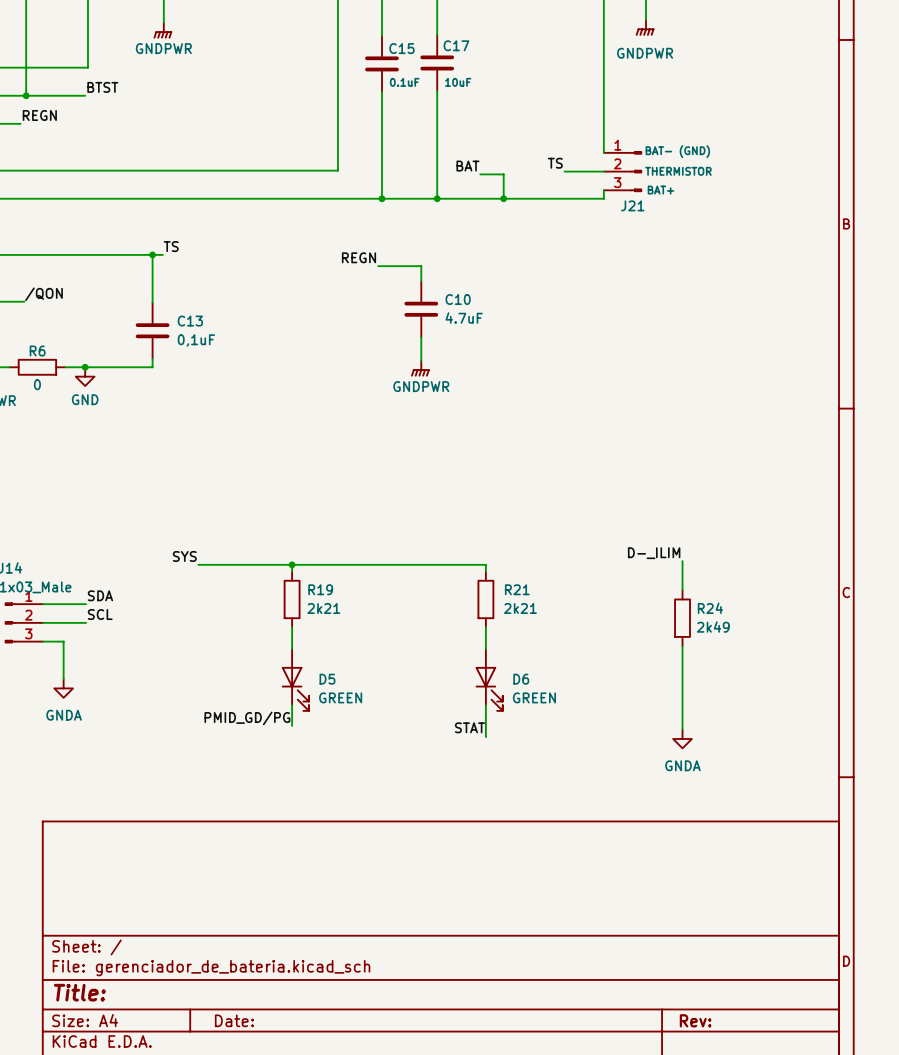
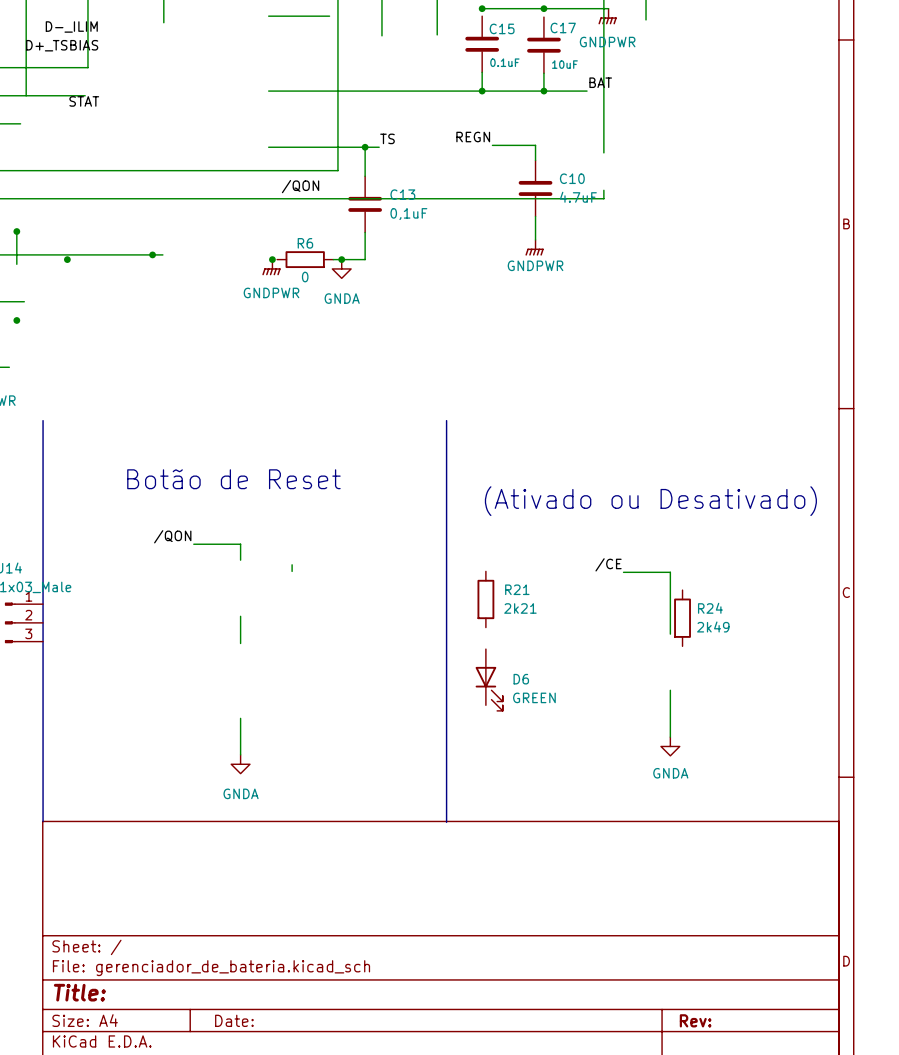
wire: none -> (482, 8) (608, 8)
junction: none -> (482, 8)
junction: none -> (543, 8)
wire: none -> (268, 16) (329, 16)
label: none -> D-_ILIM (71, 26)
power symbol position: GNDPWR (645, 27) -> GNDPWR (607, 16)
power symbol: GNDPWR (162, 30) -> none
label: none -> D+_TSBIAS (62, 45)
C17 position: (437, 62) -> (543, 45)
C15 position: (381, 63) -> (482, 44)
wire: none -> (482, 72) (482, 91)
wire: none -> (543, 73) (543, 91)
label: BTST (102, 87) -> none
wire: none -> (268, 91) (587, 91)
wire: (437, 91) (437, 198) -> none
junction: none -> (482, 91)
junction: none -> (543, 91)
wire: (381, 92) (381, 198) -> none
junction: (26, 95) -> none
label: none -> STAT (84, 101)
label: REGN (39, 115) -> none
label: none -> TS (387, 138)
wire: none -> (268, 147) (379, 147)
wire: none -> (365, 147) (365, 176)
junction: none -> (365, 147)
label: TS (555, 163) -> none
label position: BAT (467, 166) -> BAT (600, 82)
wire: (564, 171) (603, 171) -> none
J21: (622, 171) -> none
wire: (480, 174) (503, 174) (503, 198) -> none
label: none -> /QON (300, 186)
junction: (381, 198) -> none
junction: (437, 198) -> none
junction: (503, 198) -> none
wire: none -> (16, 231) (16, 264)
junction: none -> (16, 231)
wire: none -> (365, 232) (365, 259) (333, 259)
label: TS (171, 246) -> none
power symbol: none -> GNDPWR (534, 247)
wire: (152, 254) (152, 302) -> none
label position: REGN (358, 257) -> REGN (473, 137)
junction: none -> (67, 259)
junction: none -> (272, 259)
junction: none -> (341, 259)
wire: (378, 266) (421, 266) (421, 281) -> (492, 145) (535, 145) (535, 160)
power symbol: none -> GNDPWR (271, 267)
power symbol: none -> GNDA (341, 268)
label: /QON (44, 294) -> none
C10 position: (421, 309) -> (535, 188)
junction: none -> (16, 320)
C13 position: (152, 330) -> (365, 204)
wire: (421, 337) (421, 360) -> (535, 216) (535, 239)
wire: (152, 358) (152, 367) (65, 367) -> none
R6 position: (37, 367) -> (305, 259)
junction: (85, 367) -> none
power symbol: GNDPWR (420, 368) -> none
power symbol: GND (85, 376) -> none
line: none -> (43, 420) (43, 821)
line: none -> (446, 420) (446, 822)
text: none -> Botão de Reset (233, 479)
text: none -> (Ativado ou Desativado) (650, 501)
label: none -> /QON (172, 536)
wire: none -> (193, 544) (240, 544) (240, 560)
label: D-_ILIM (654, 553) -> none
label: SYS (184, 556) -> none
wire: (682, 561) (682, 590) -> none
wire: (198, 564) (485, 564) (485, 571) -> none
junction: (292, 564) -> none
label: none -> /CE (608, 564)
wire: none -> (623, 572) (670, 572) (670, 634)
label: SDA (100, 595) -> none
R19: 2k21 (292, 599) -> none
wire: (43, 604) (86, 604) -> none
label: SCL (100, 614) -> none
wire: none -> (240, 616) (240, 643)
wire: (43, 622) (86, 622) -> none
wire: (292, 627) (292, 649) -> none
wire: (485, 627) (485, 649) -> none
wire: (43, 641) (63, 641) (63, 679) -> none
wire: (682, 646) (682, 729) -> none
D5: GREEN (295, 680) -> none
power symbol: GNDA (63, 688) -> none
wire: none -> (670, 690) (670, 737)
wire: (292, 705) (292, 725) -> none
wire: (485, 705) (485, 737) -> none
wire: none -> (240, 718) (240, 754)
label: PMID_GD/PG (247, 718) -> none
label: STAT (470, 727) -> none
power symbol position: GNDA (682, 738) -> GNDA (670, 746)
power symbol: none -> GNDA (240, 764)

